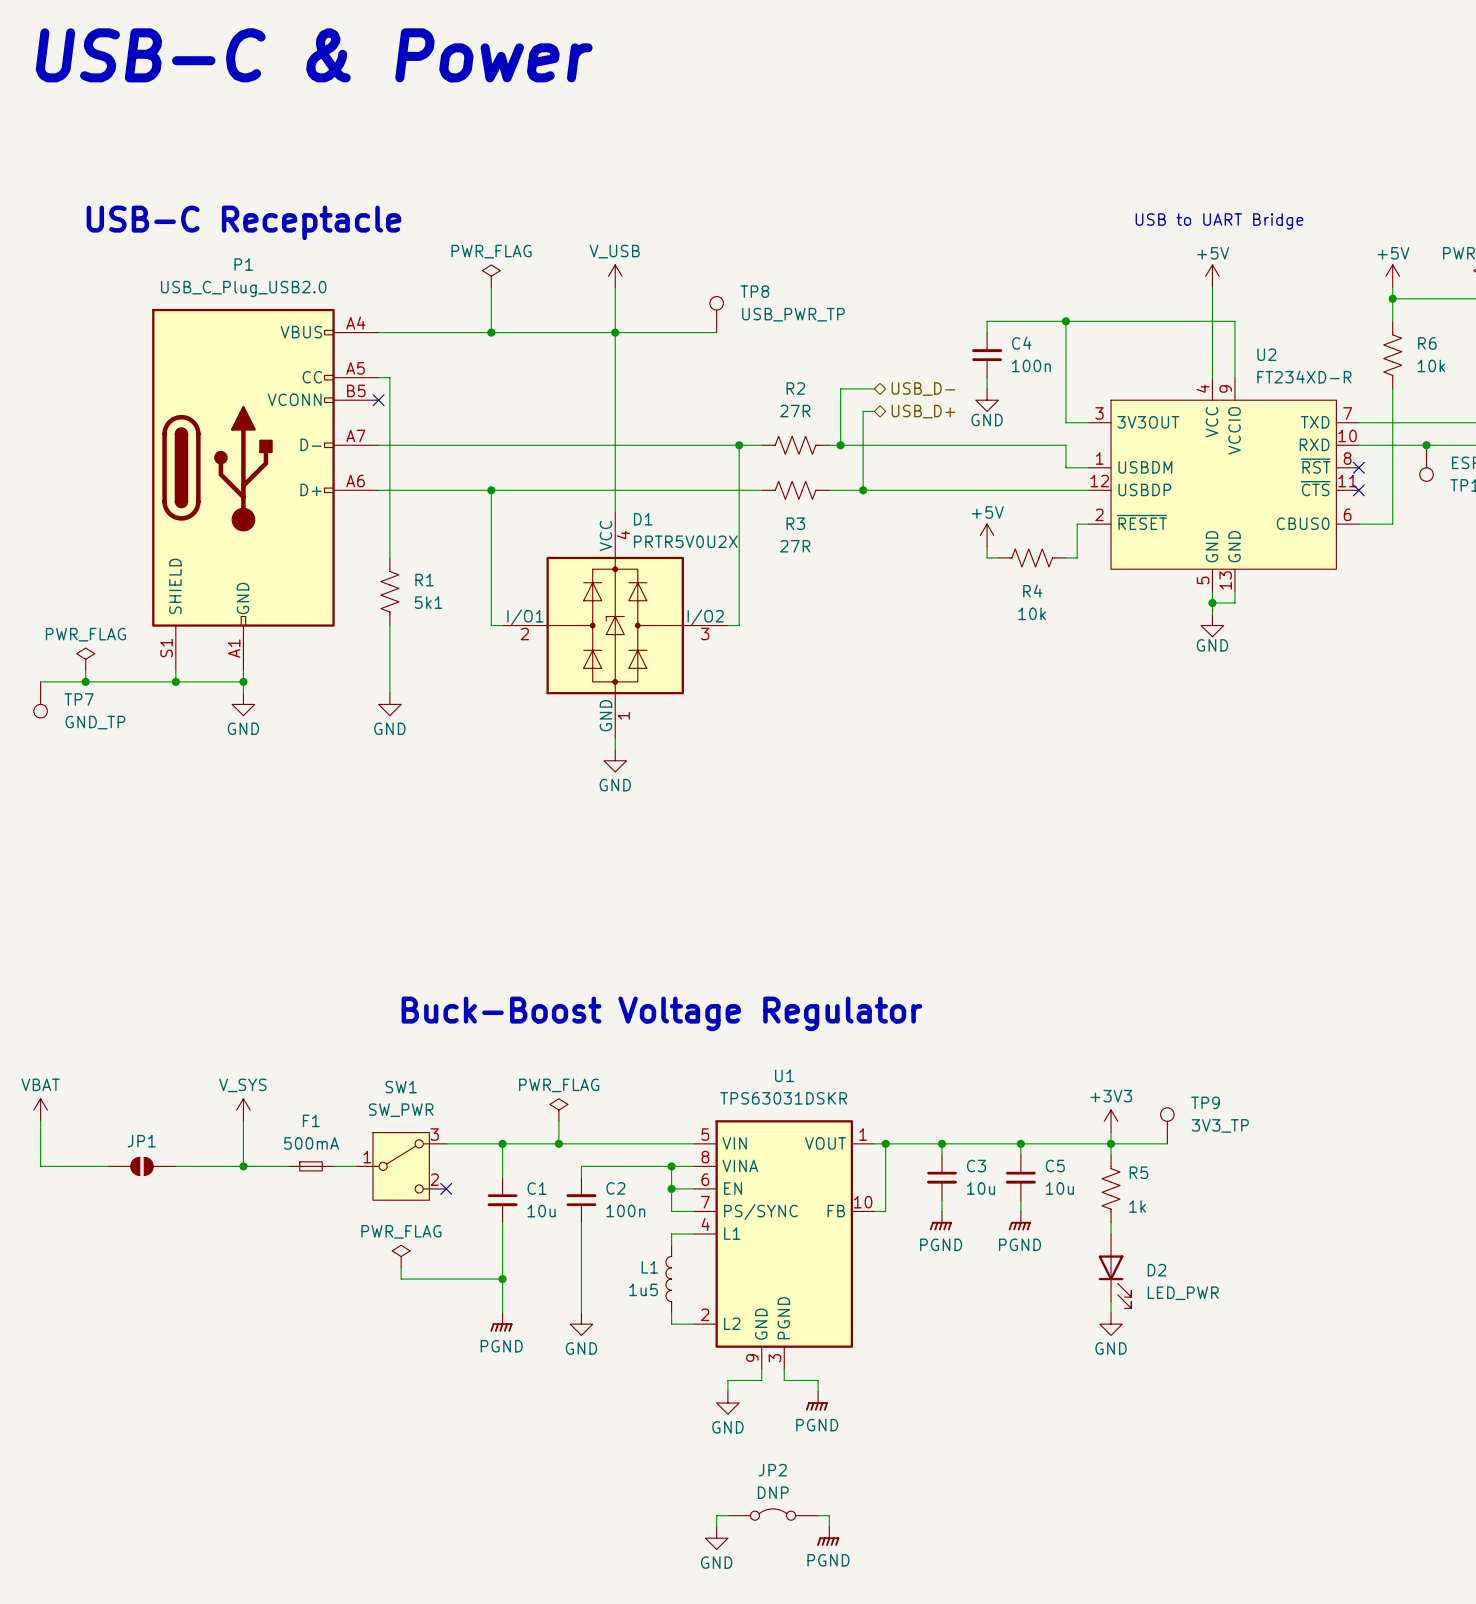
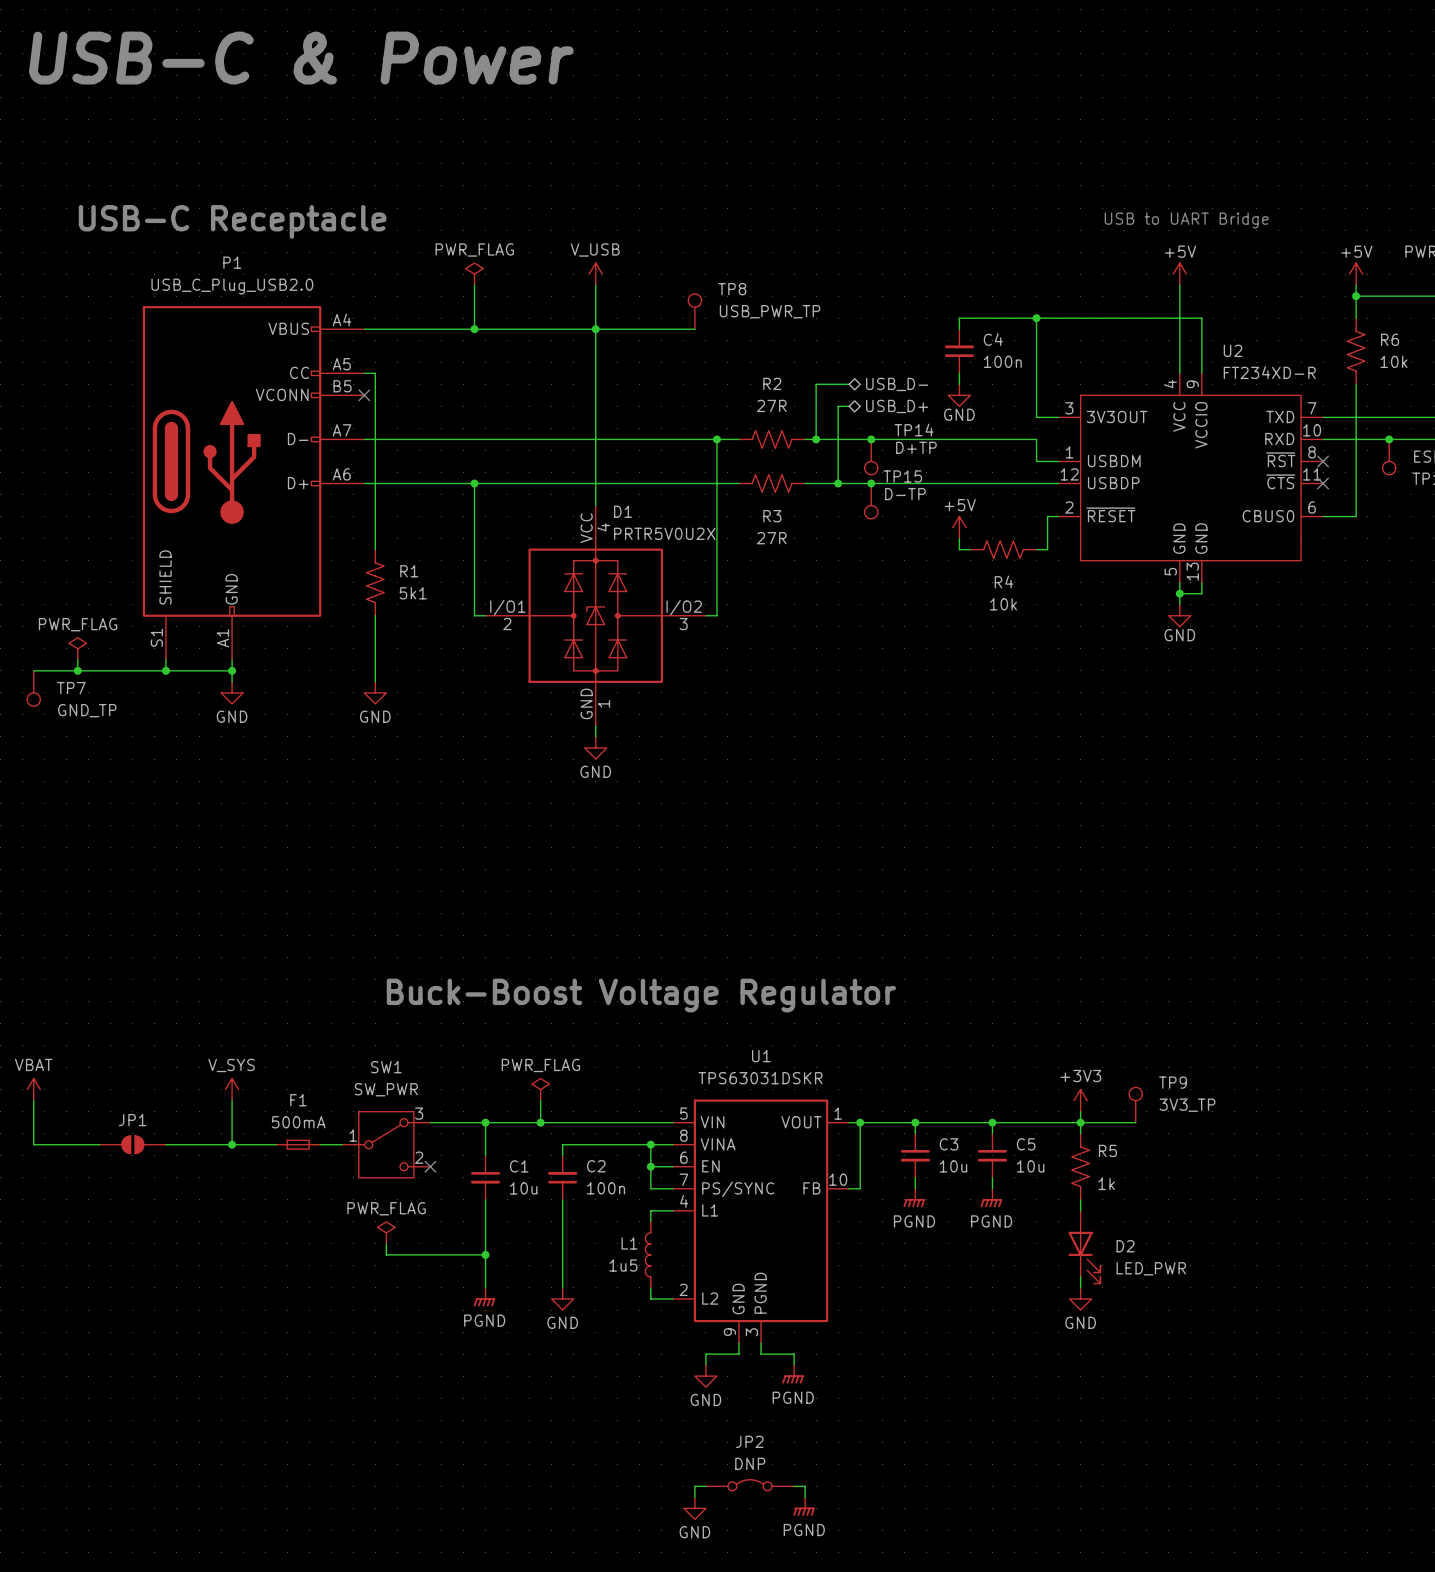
junction: none -> (871, 439)
TP14: none -> D+TP (871, 457)
junction: none -> (871, 483)
TP15: none -> D-TP (871, 501)

